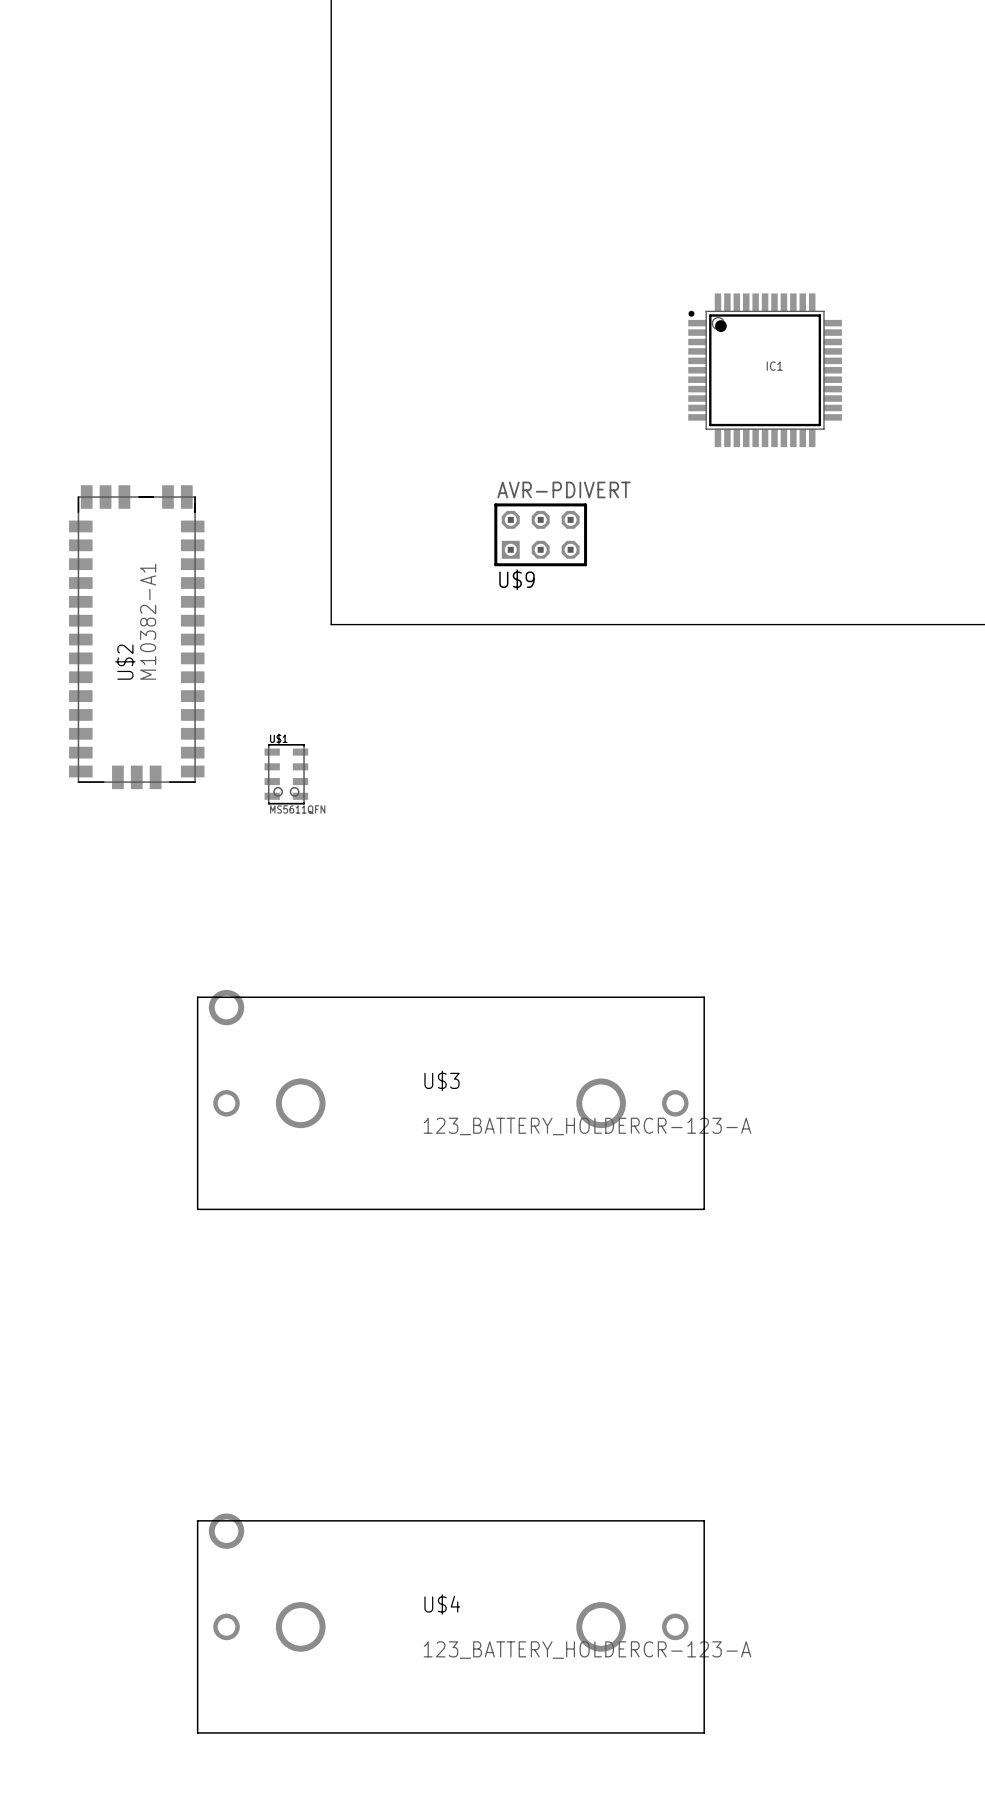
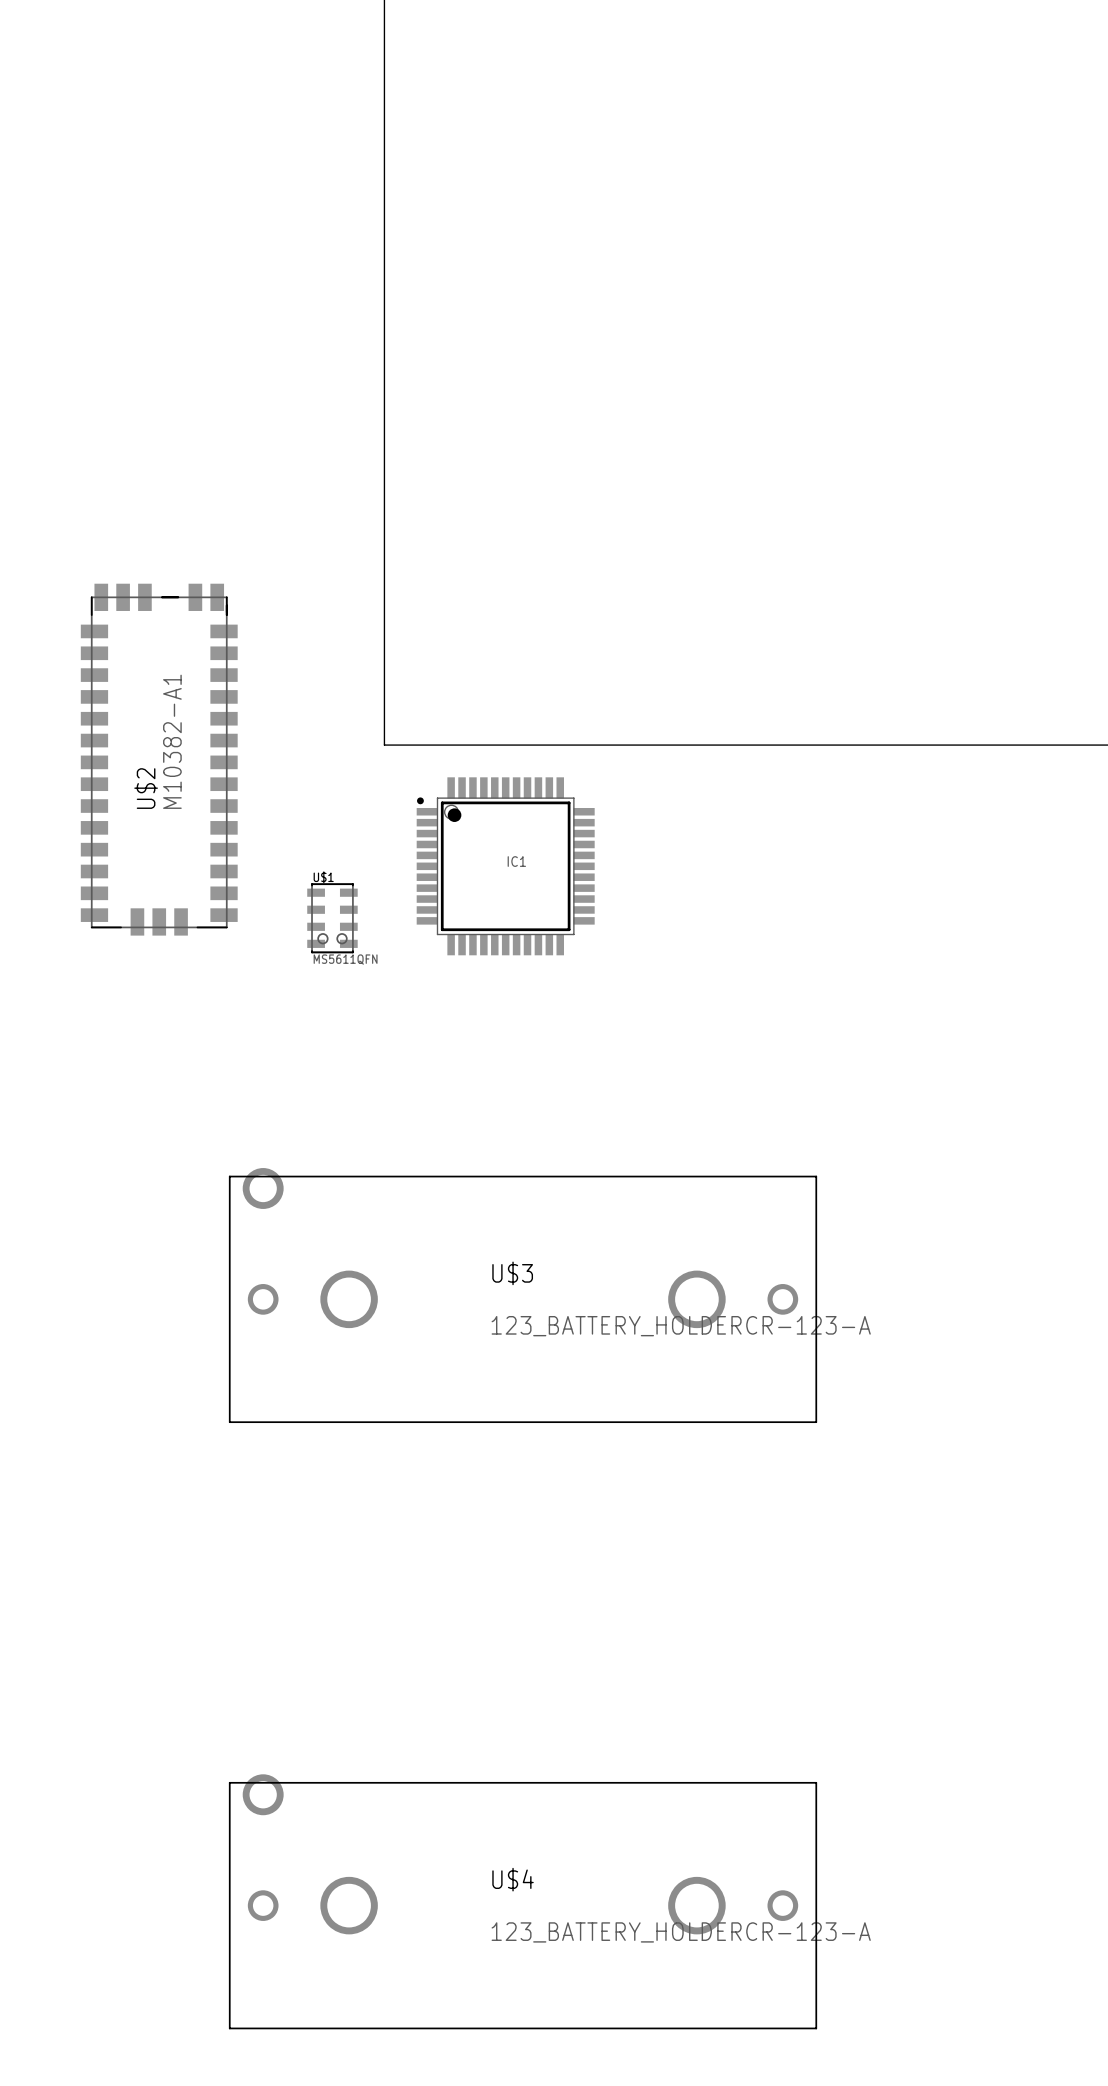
IC1 position: (765, 370) -> (505, 866)
U$9: AVR-PDIVERT (540, 534) -> none

